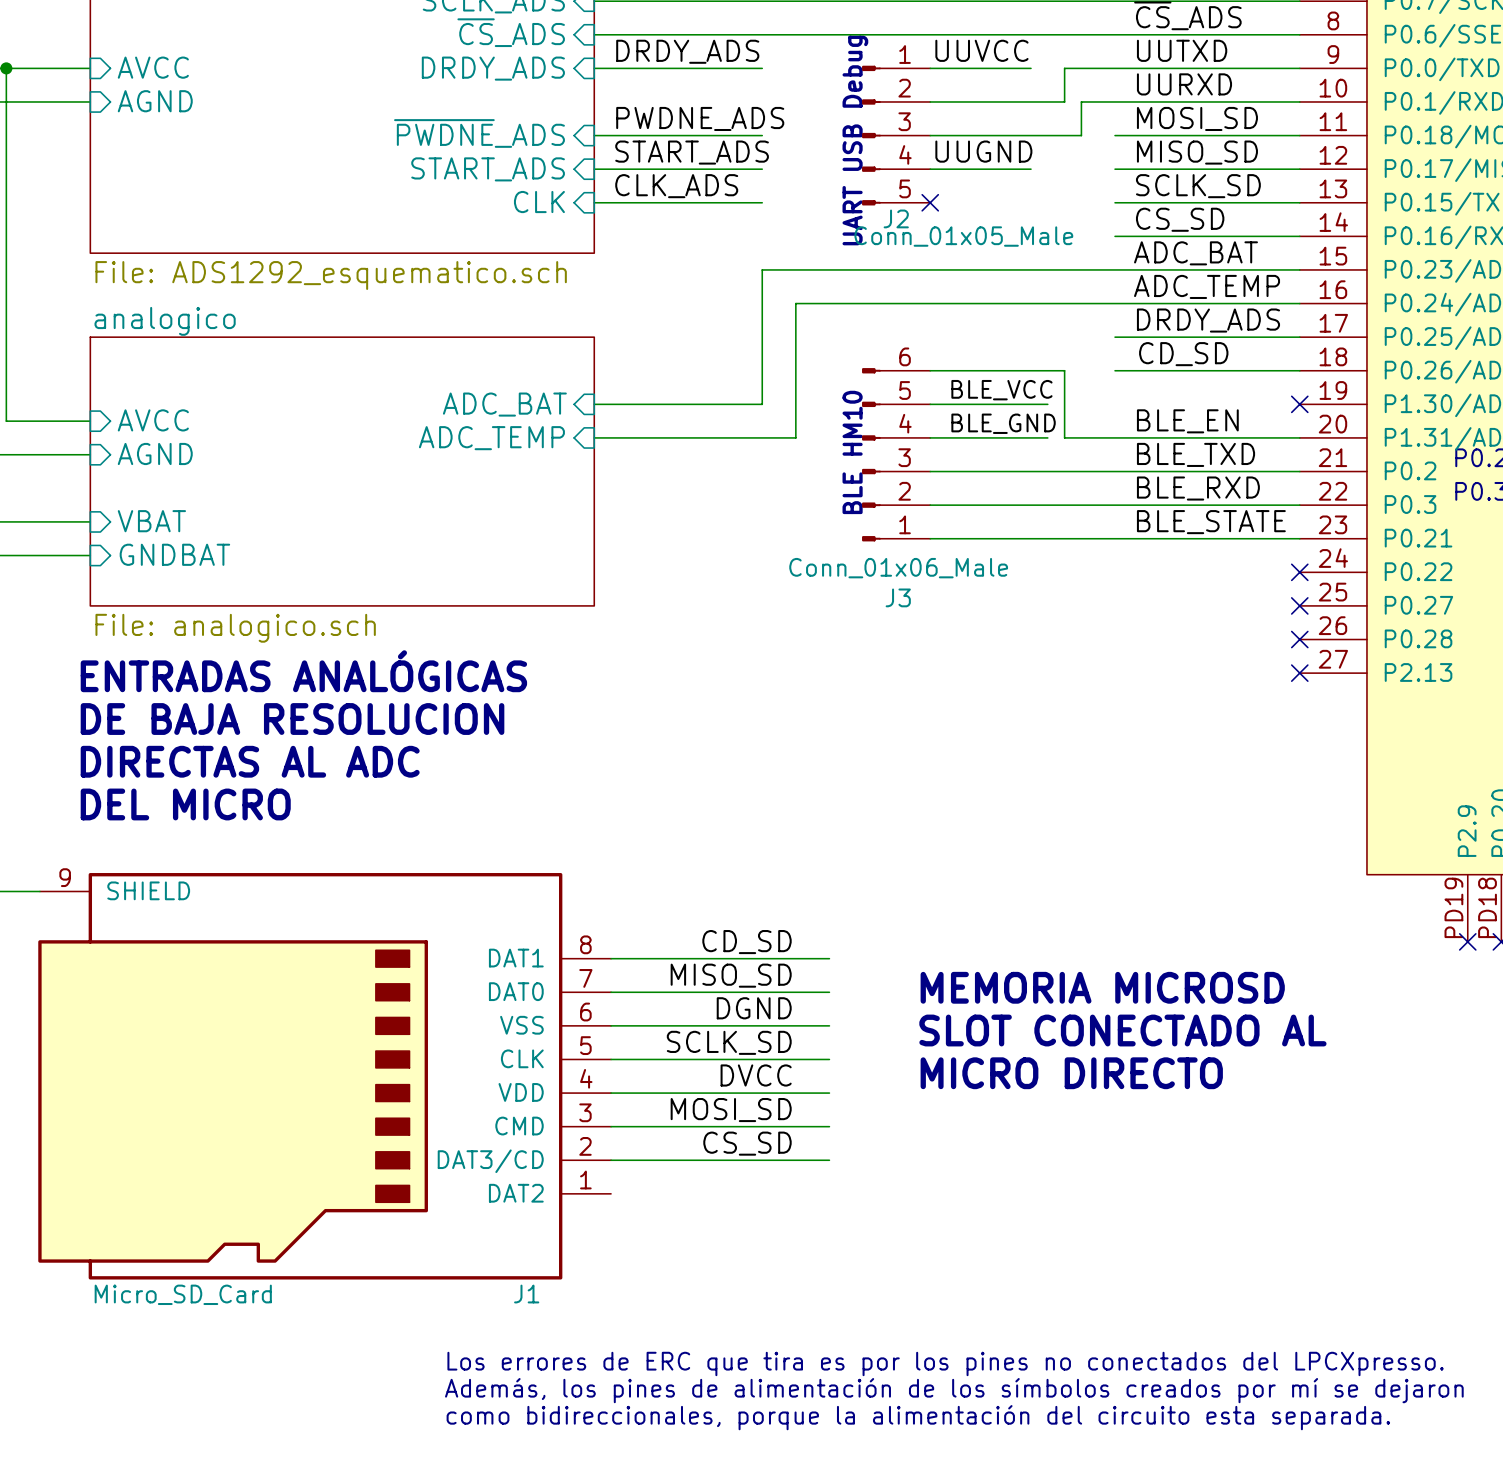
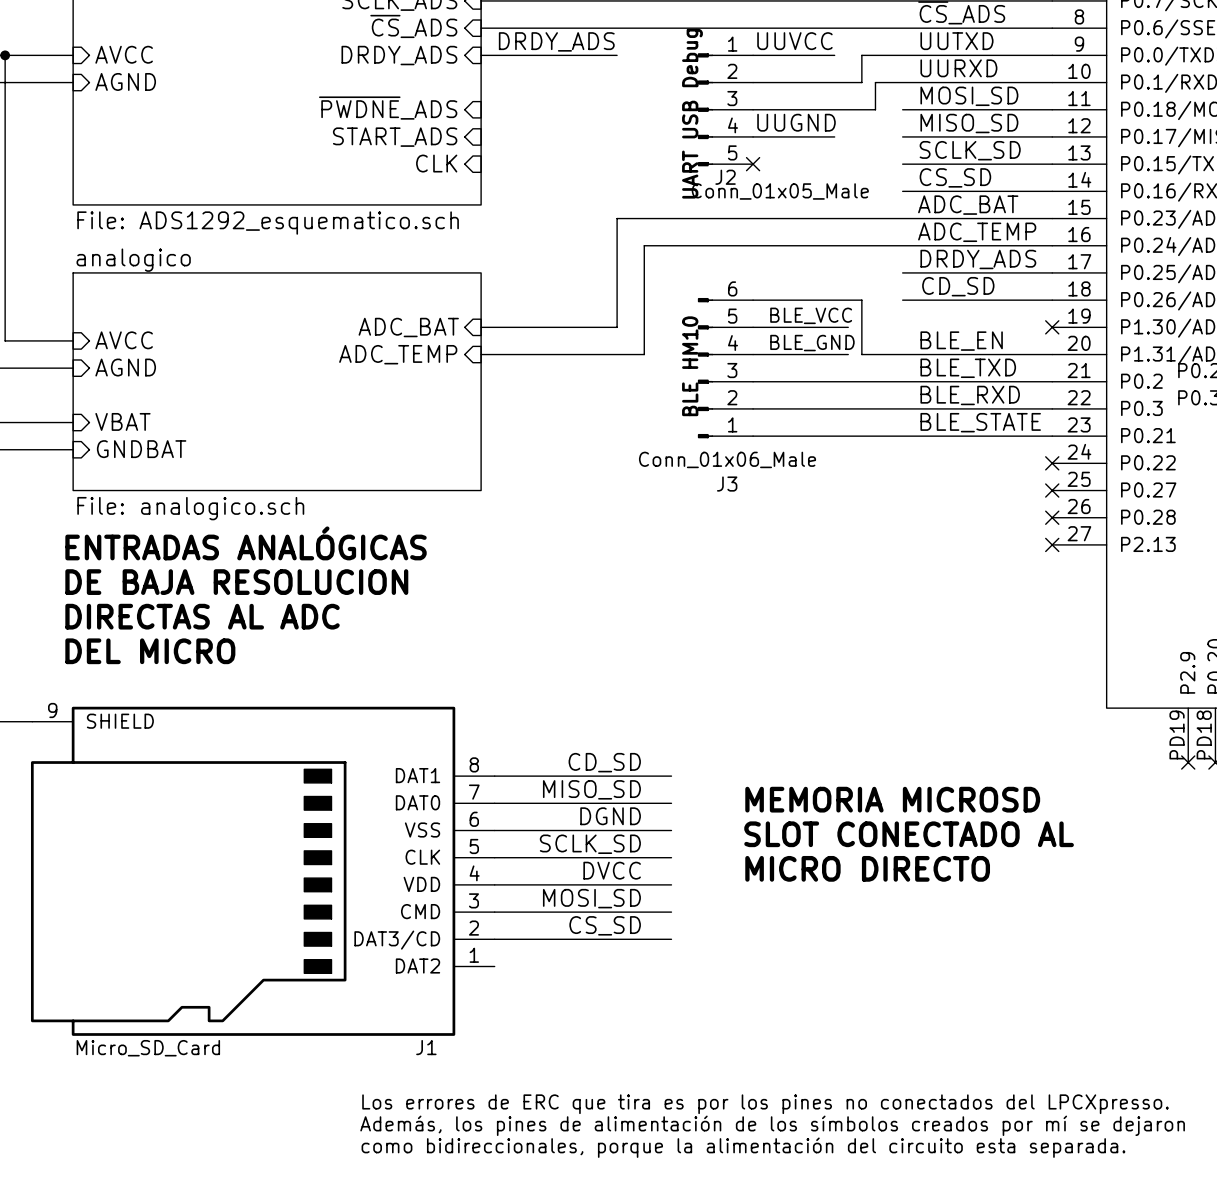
label: PWDNE_ADS (700, 118) -> none
wire: (594, 135) (762, 135) -> none
label: START_ADS (692, 152) -> none
wire: (594, 169) (762, 169) -> none
label: CLK_ADS (676, 186) -> none
wire: (594, 202) (762, 202) -> none

